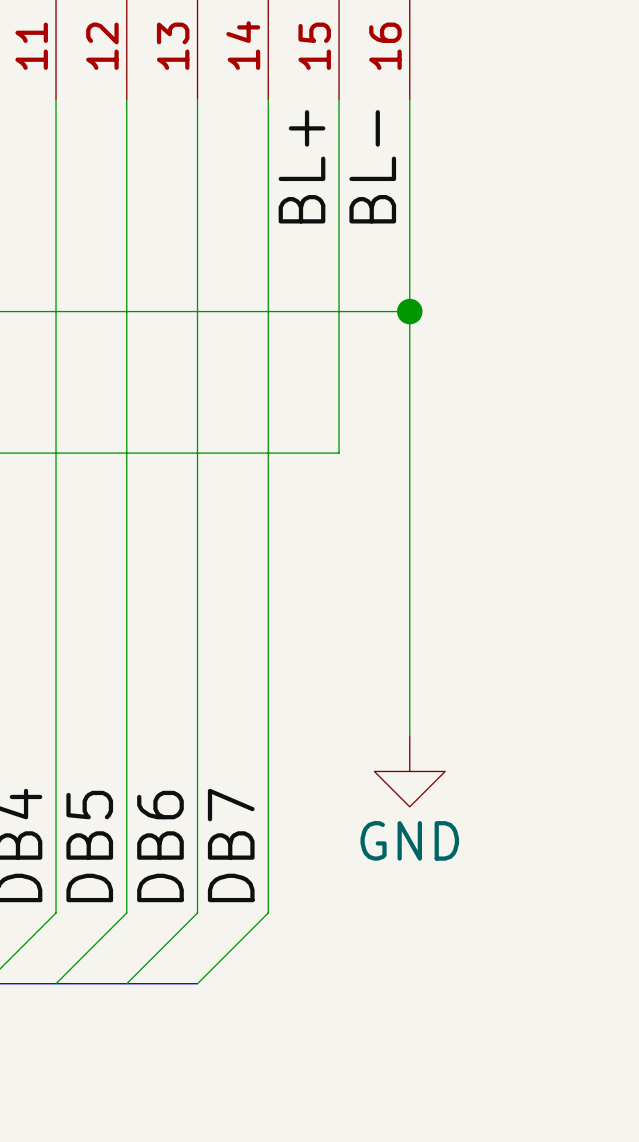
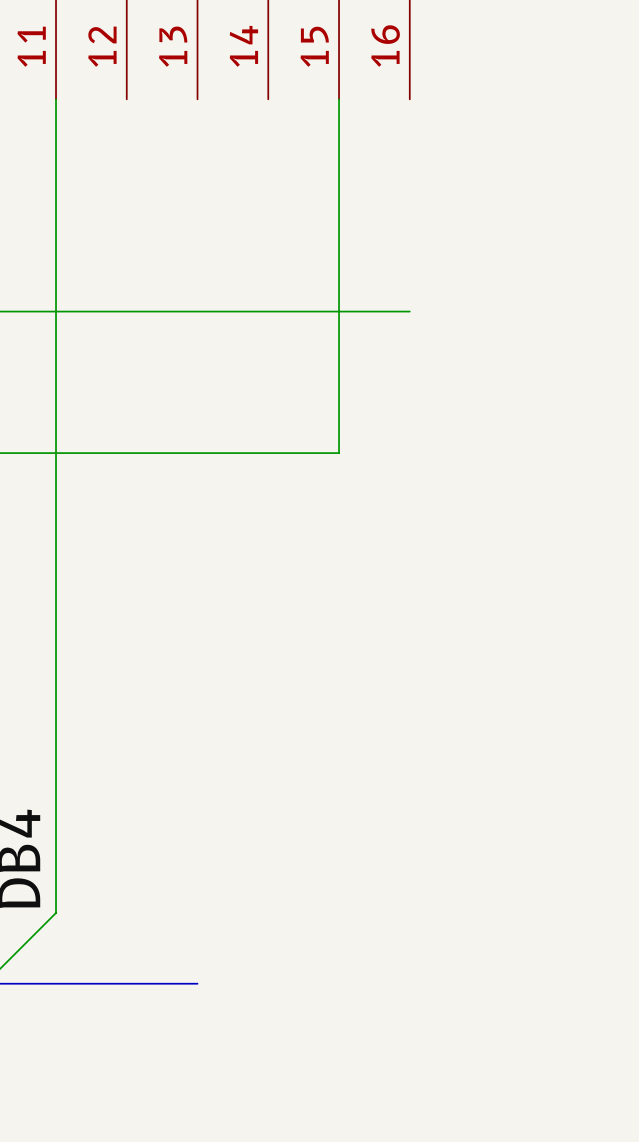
wire: (126, 99) (126, 912) (56, 983) -> none
wire: (197, 99) (197, 912) (126, 983) -> none
wire: (268, 99) (268, 912) (197, 983) -> none
wire: (409, 99) (409, 736) -> none
label: BL+ (301, 166) -> none
label: BL- (372, 166) -> none
junction: (409, 311) -> none
power symbol: GND (409, 771) -> none
label: DB7 (231, 845) -> none
label: DB5 (89, 846) -> none
label: DB6 (160, 846) -> none

